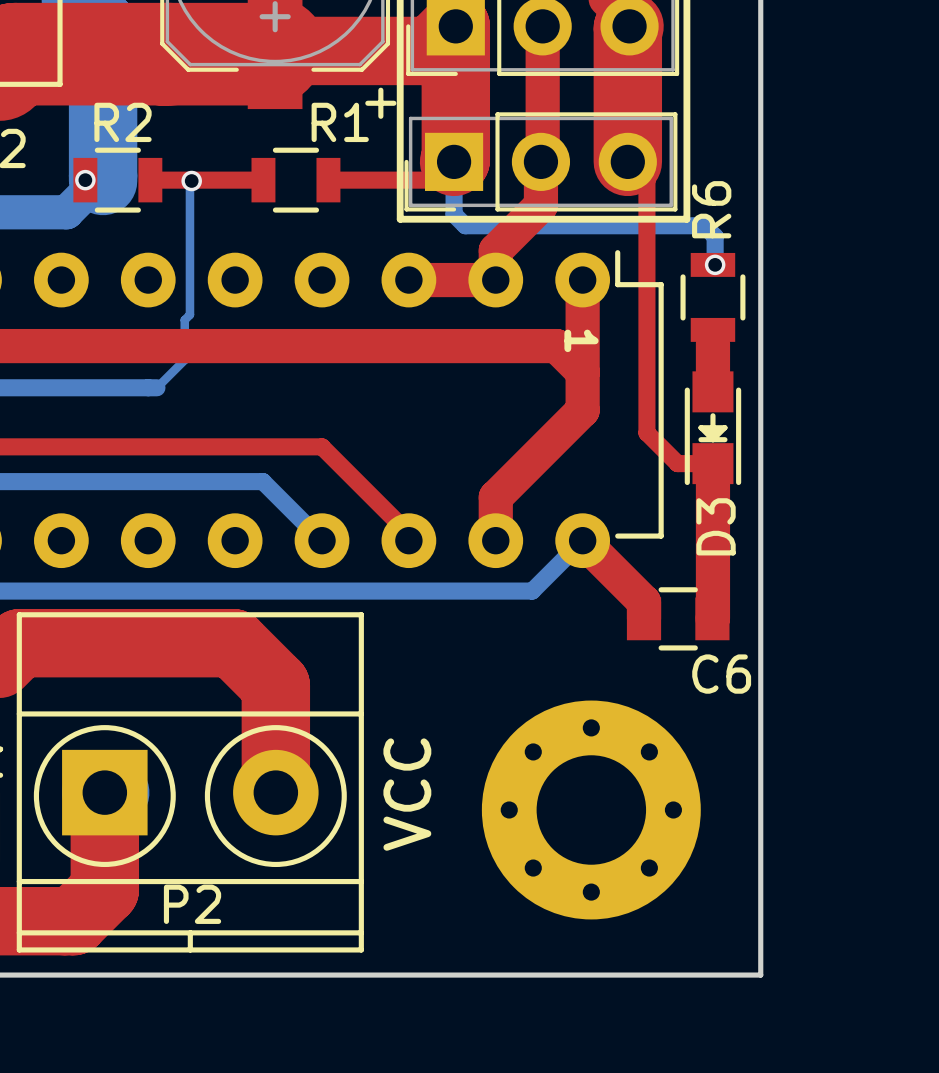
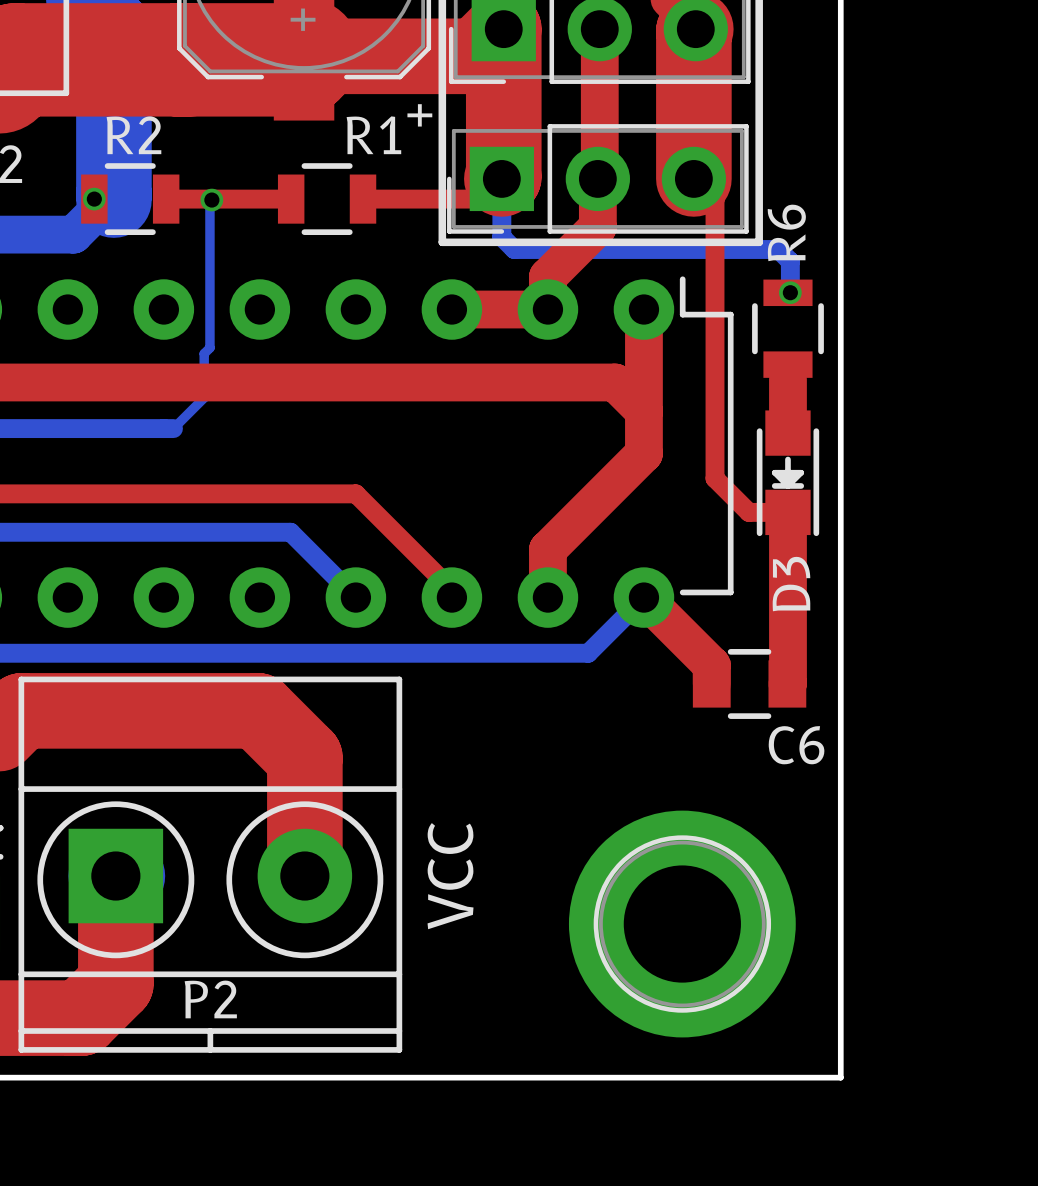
text: 1 (581, 340) -> none
part: (591, 810) -> none
part: none -> (682, 924)

